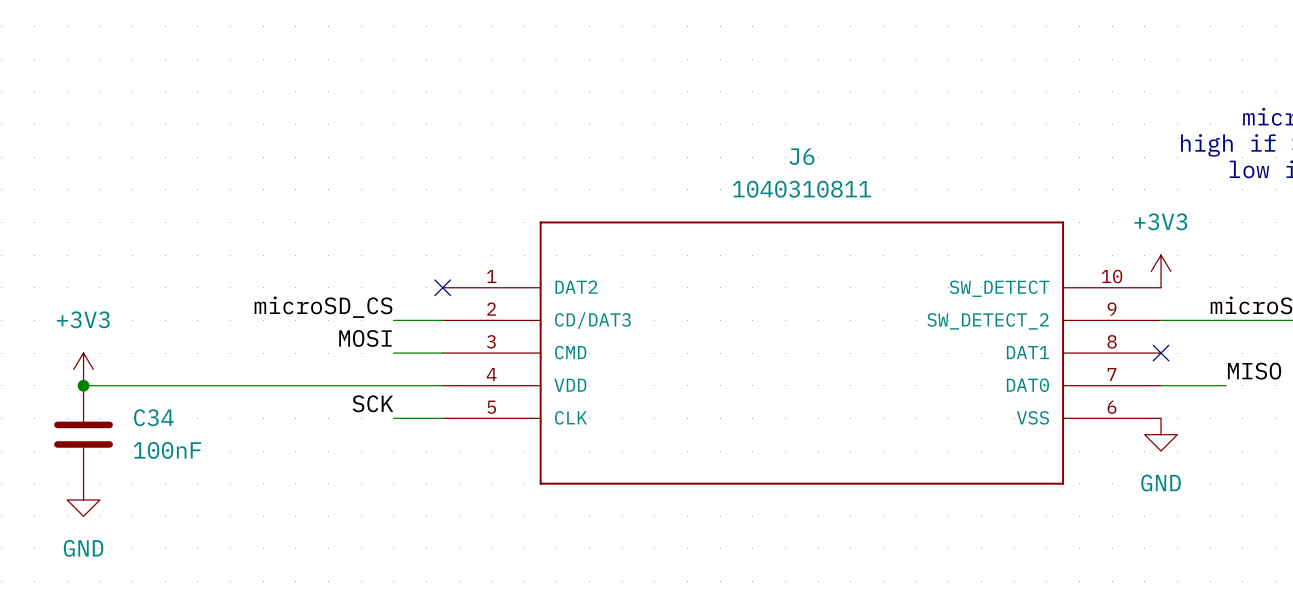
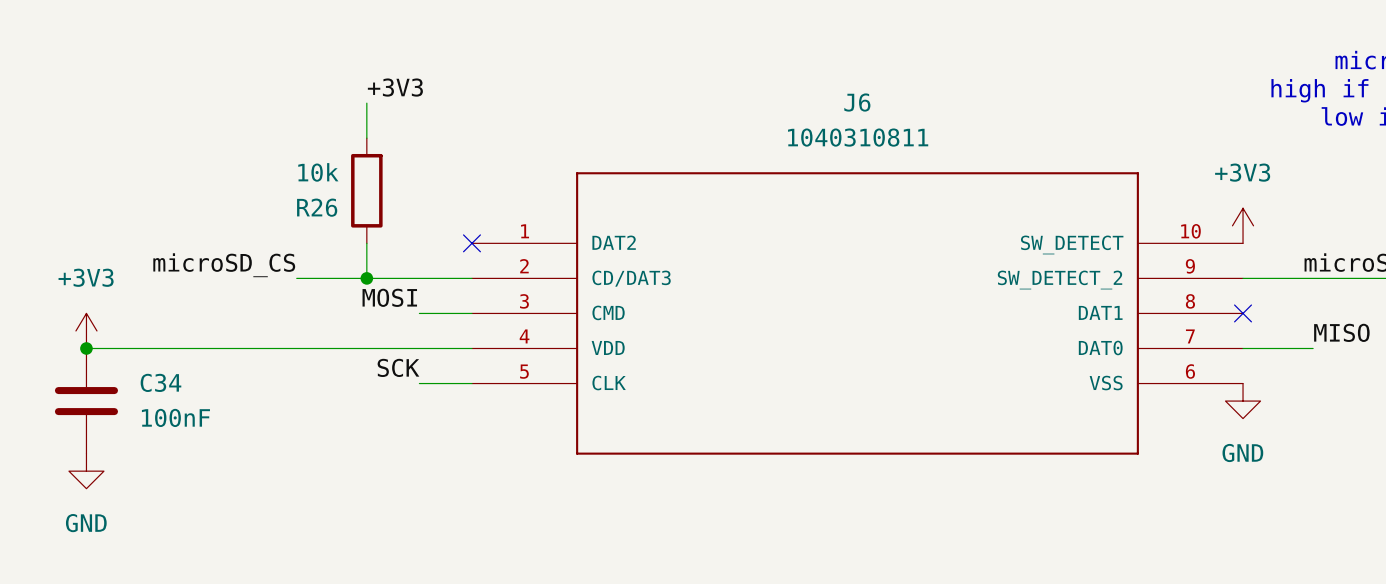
label: none -> +3V3 (395, 87)
wire: none -> (366, 103) (366, 138)
R26: none -> 10k (366, 190)
wire: none -> (366, 243) (366, 278)
label position: microSD_CS (323, 307) -> microSD_CS (224, 265)
wire: none -> (296, 278) (419, 278)
junction: none -> (366, 278)

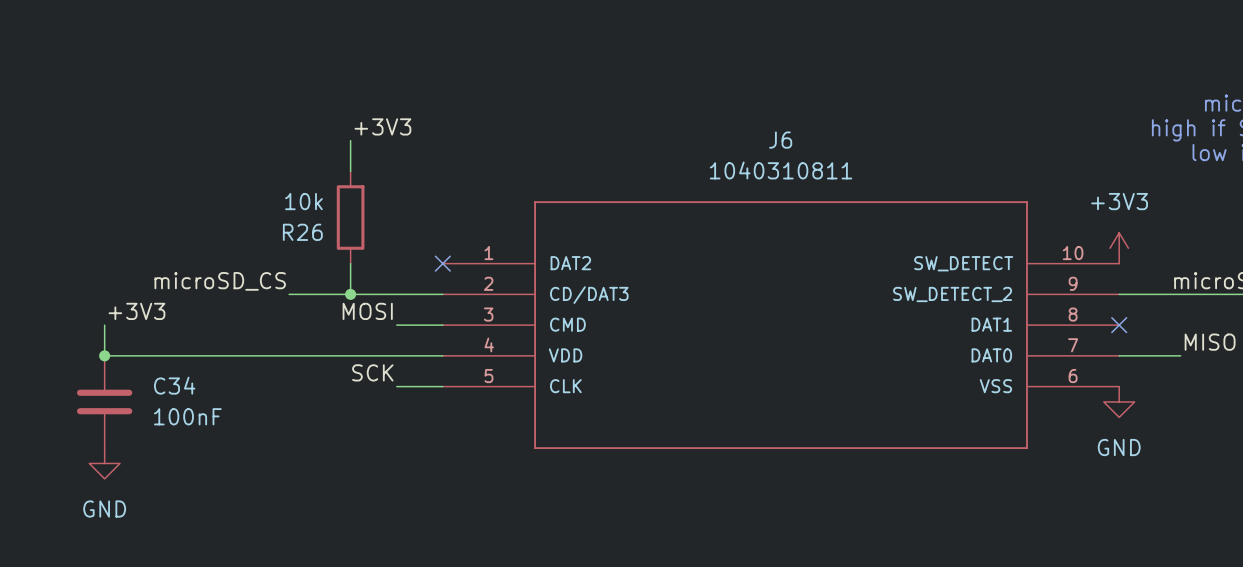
label: none -> +3V3 (136, 311)
power symbol: +3V3 (86, 330) -> none

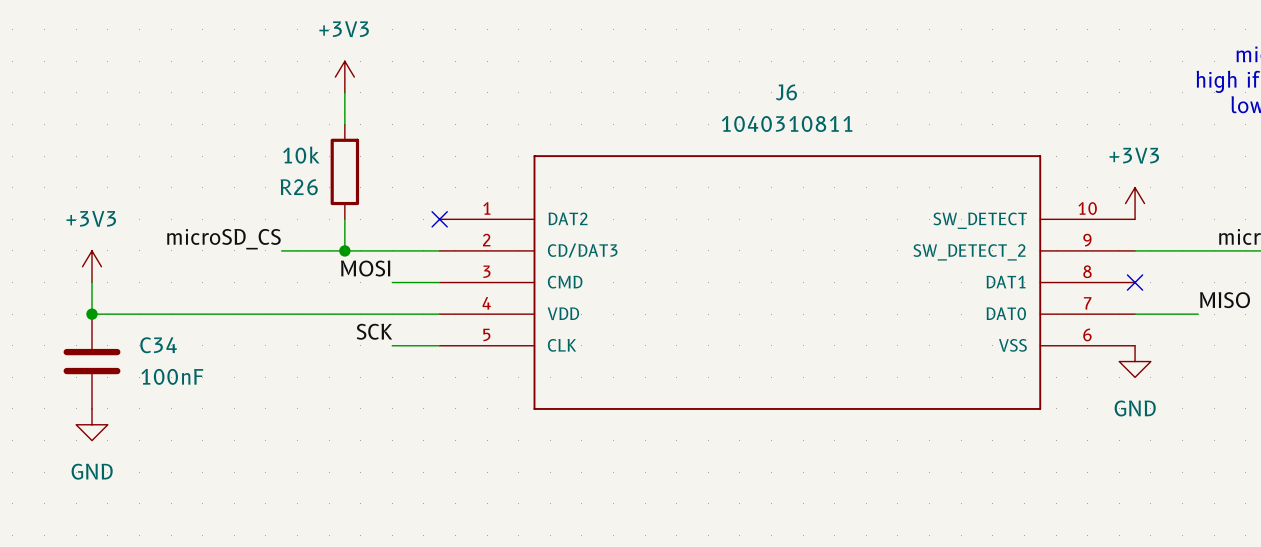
power symbol: none -> +3V3 (344, 77)
label: +3V3 (382, 126) -> none
power symbol: none -> +3V3 (91, 266)
label: +3V3 (136, 311) -> none

